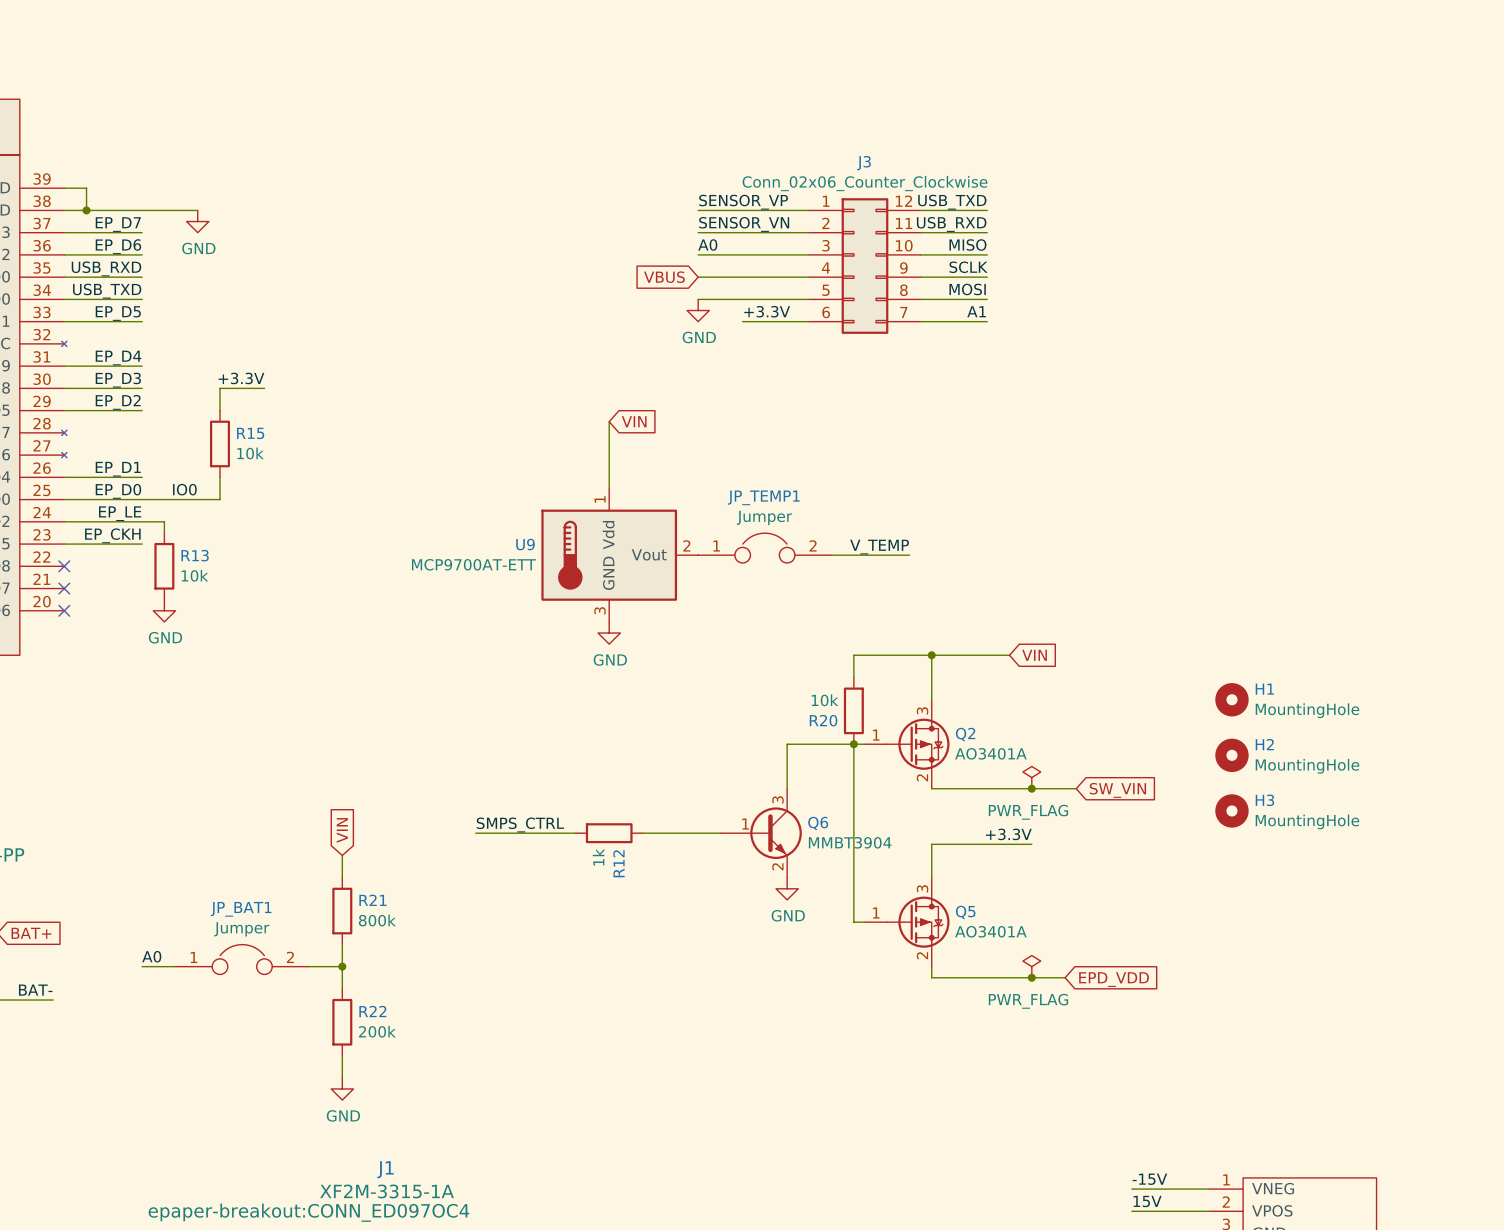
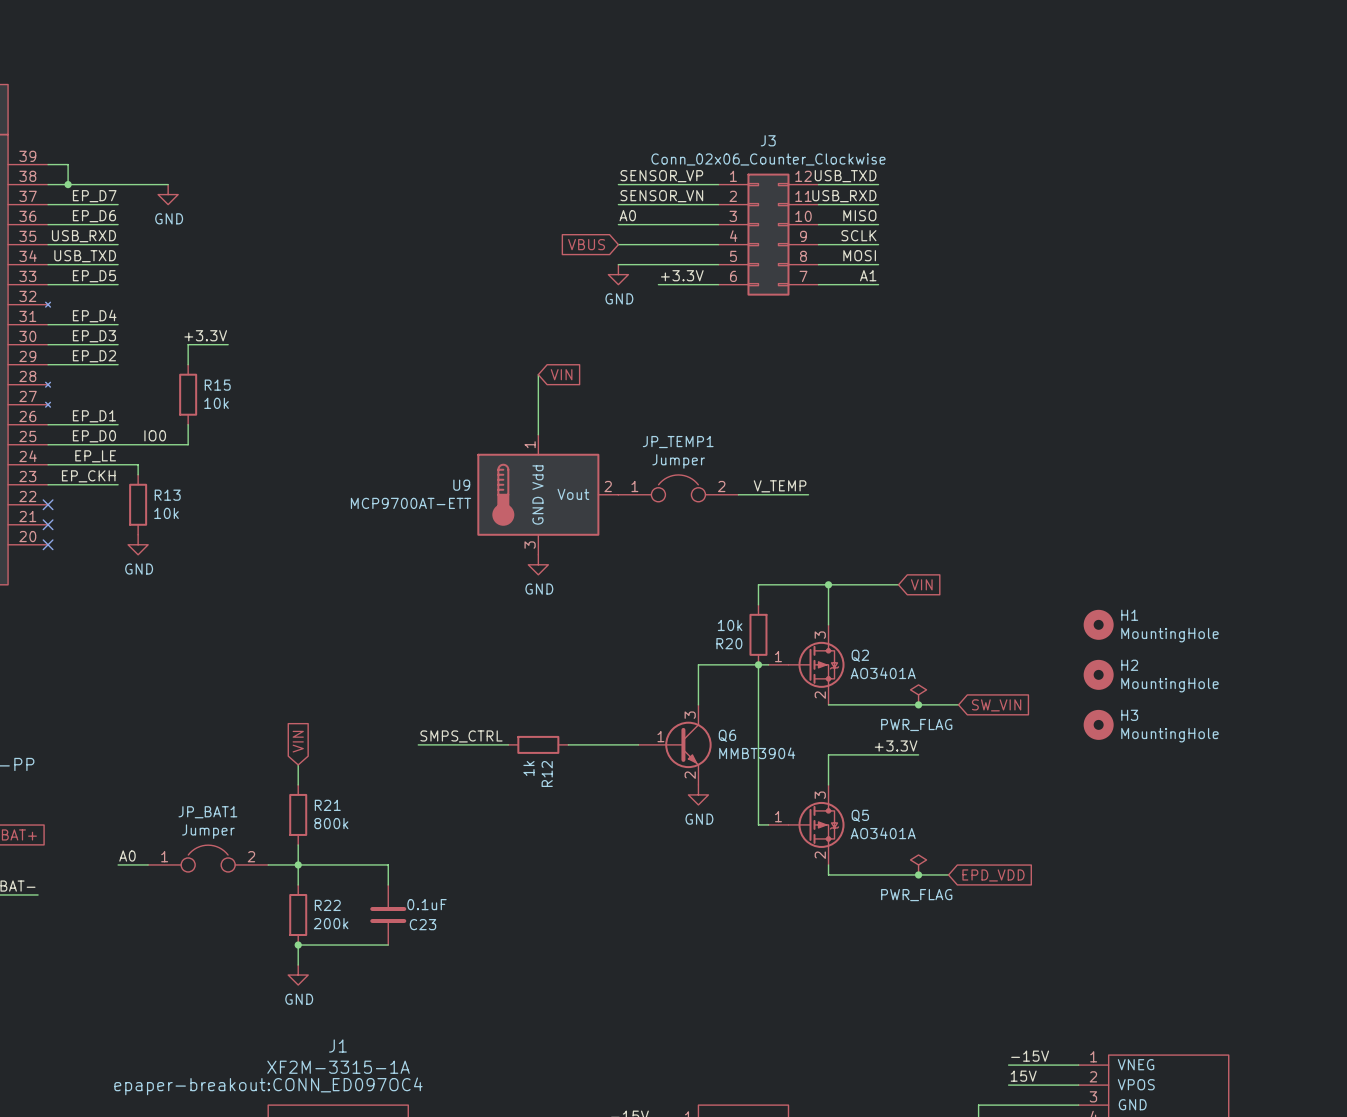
wire: none -> (298, 864) (388, 864) (388, 884)
C23: none -> 0.1uF (388, 915)
wire: none -> (298, 945) (388, 945)
junction: none -> (298, 945)

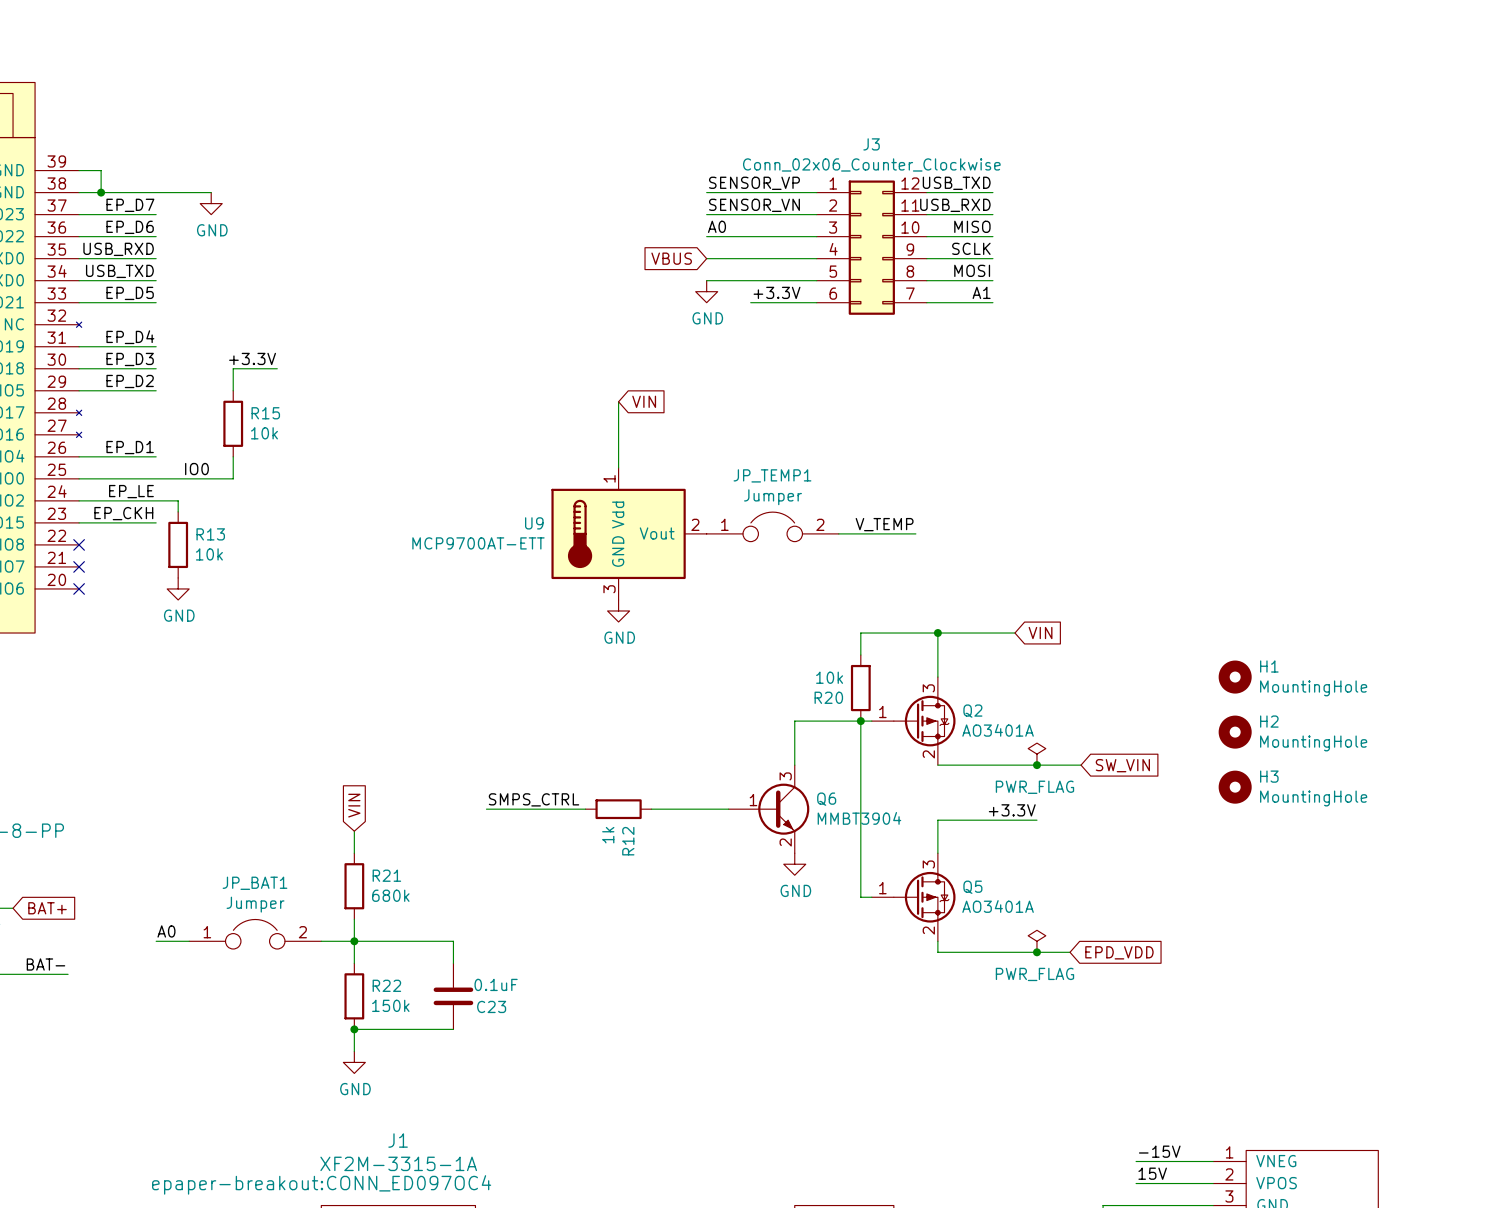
label: EP_D0 (94, 436) -> none
R21 value: 800k (331, 823) -> 680k (390, 895)
R22 value: 200k (331, 923) -> 150k (390, 1005)

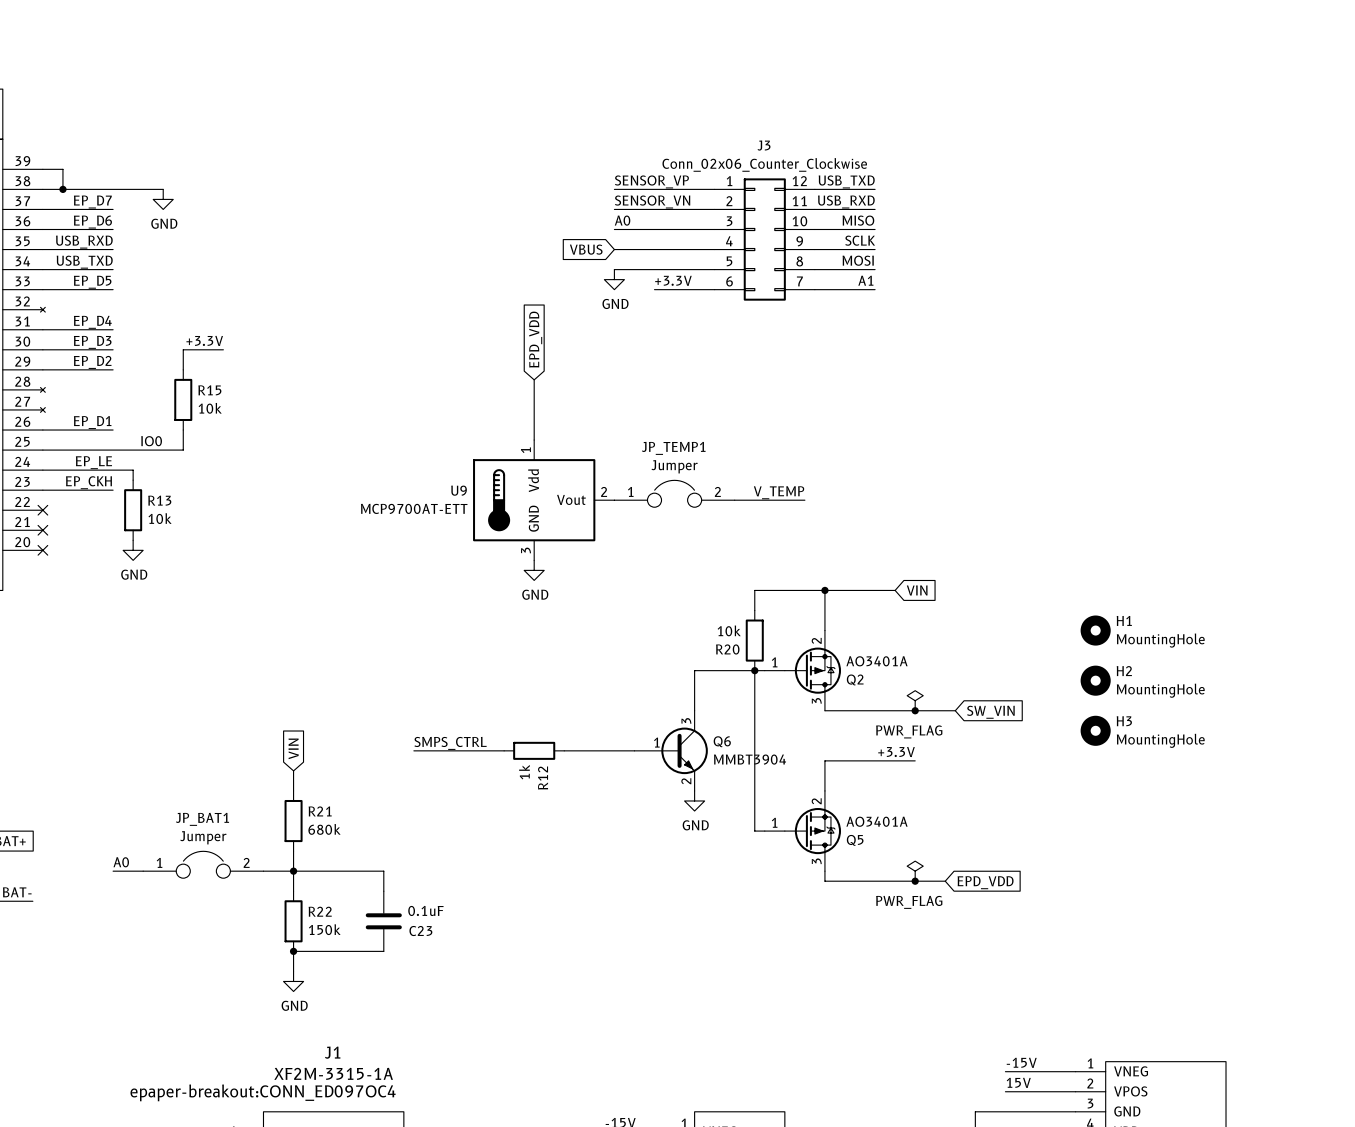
global label: VIN (644, 401) -> EPD_VDD (535, 339)
Q2 flip: as is (924, 721) -> up-down (812, 670)
Q5 flip: as is (924, 897) -> up-down (812, 831)

